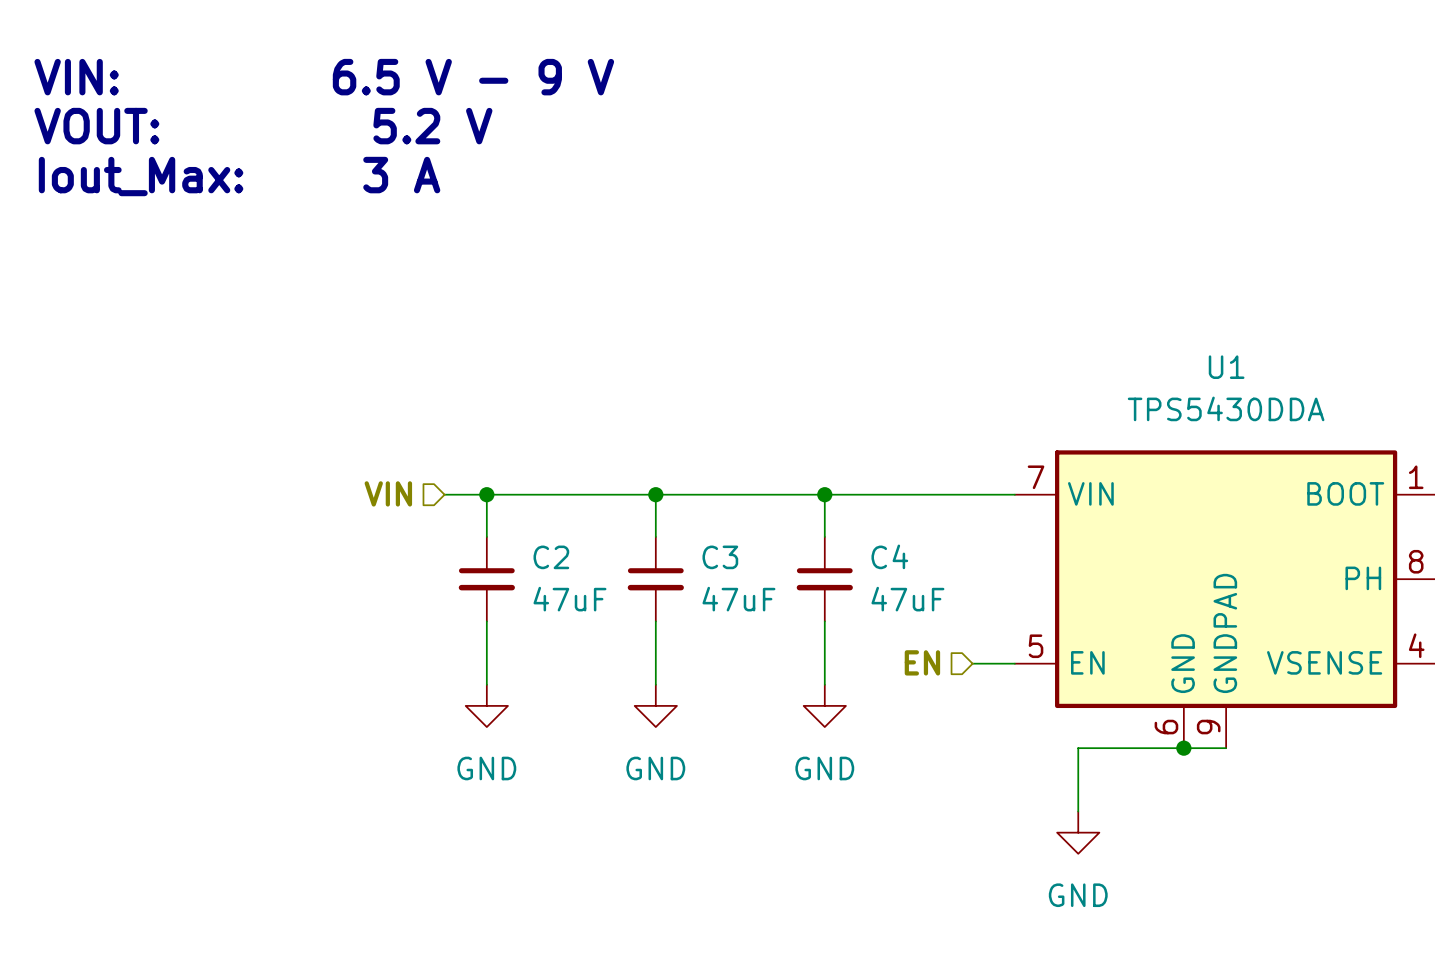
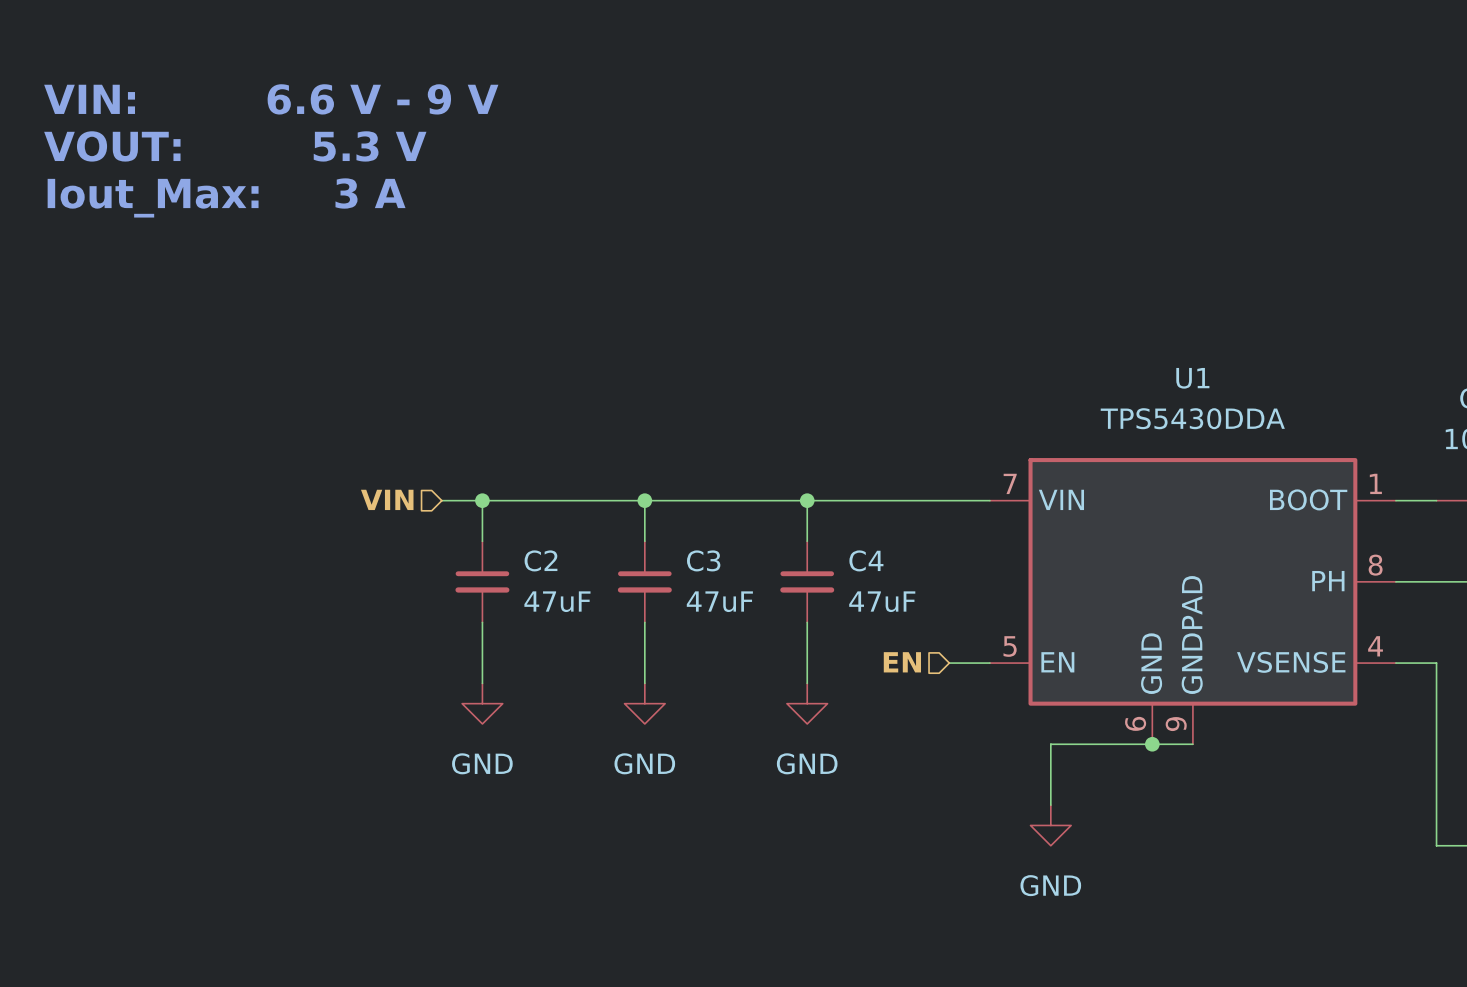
text: VIN: 6.5 V - 9 V (324, 77) -> VIN: 6.6 V - 9 V (271, 99)
text: VOUT: 5.2 V (263, 126) -> VOUT: 5.3 V (235, 146)

